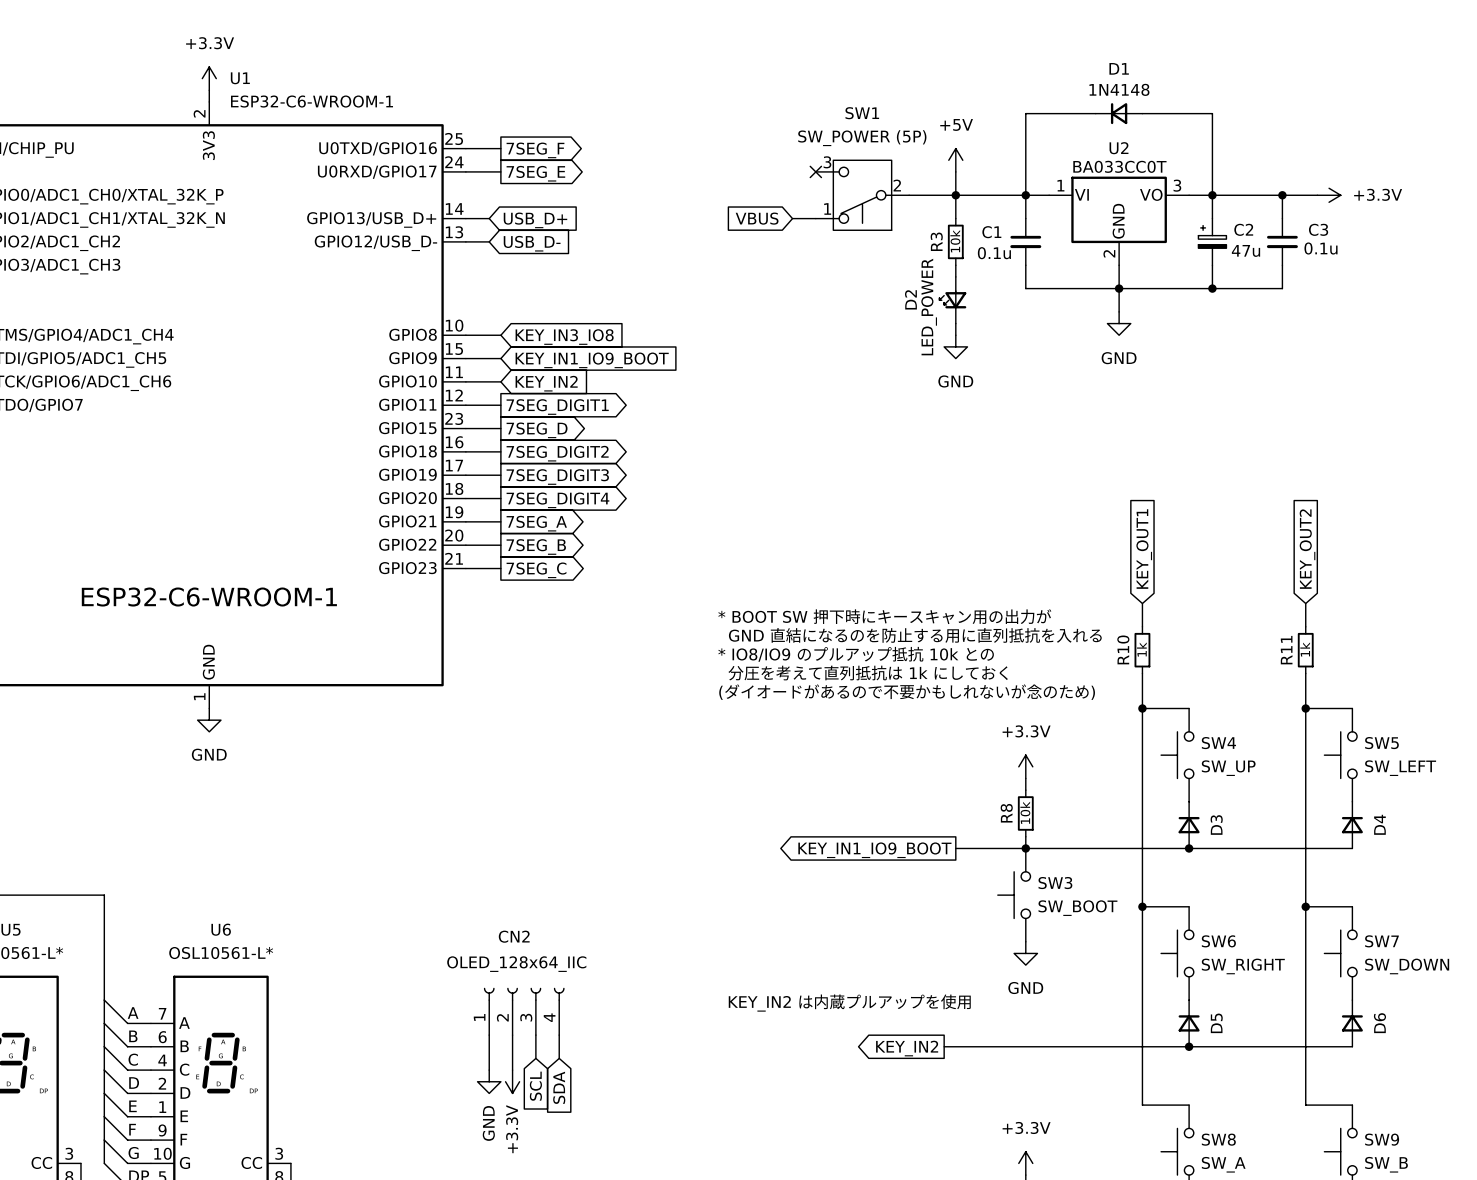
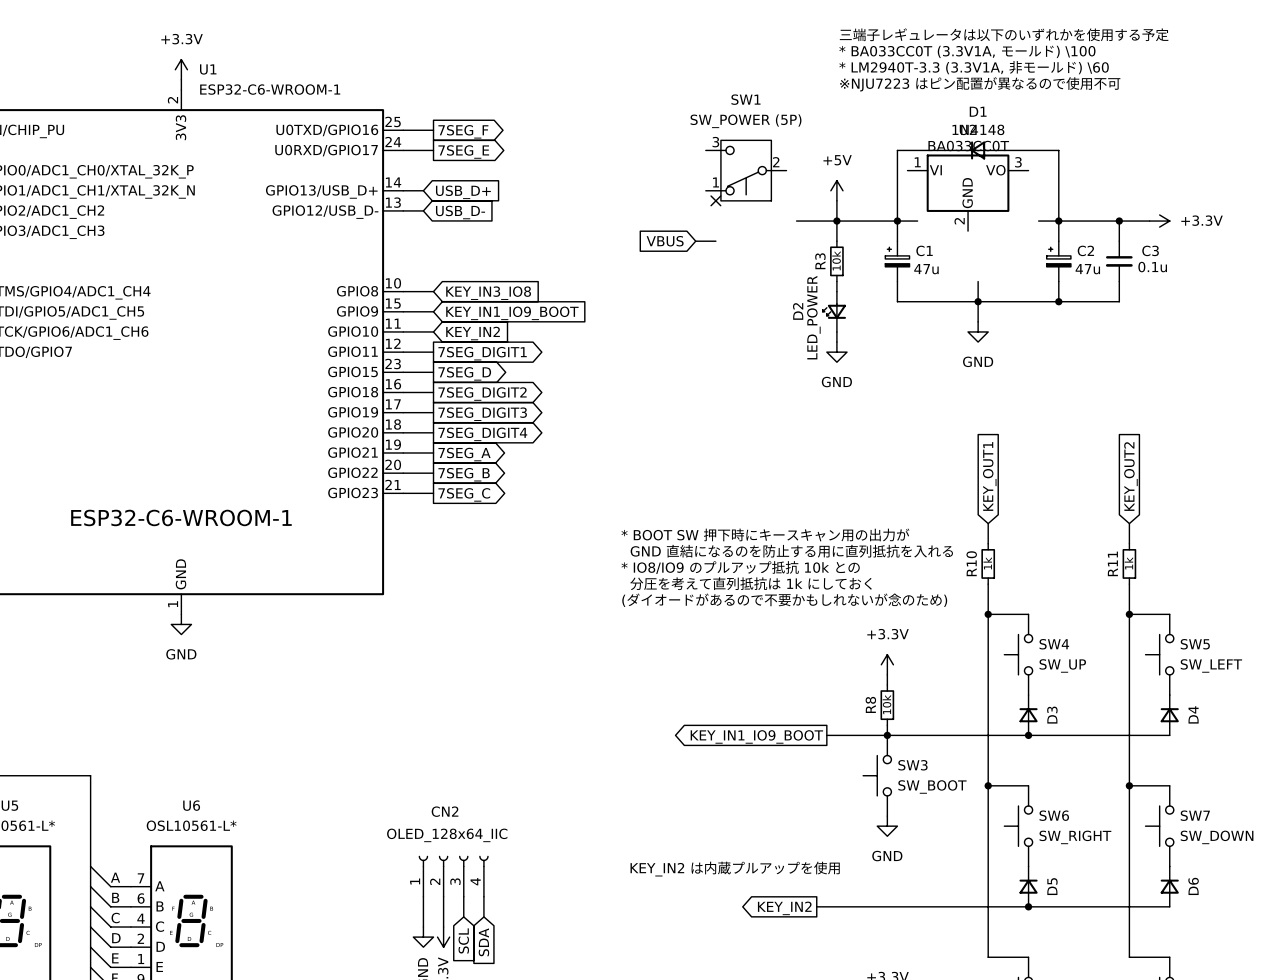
text: none -> 三端子レギュレータは以下のいずれかを使用する予定 (1004, 34)
text: none -> * BA033CC0T (3.3V1A, モールド) \100 (967, 51)
text: none -> * LM2940T-3.3 (3.3V1A, 非モールド) \60 (974, 67)
text: none -> ※NJU7223 はピン配置が異なるので使用不可 (980, 84)
wire: (1095, 113) (1025, 113) (1025, 218) -> (957, 150) (897, 150) (897, 241)
D1 position: (1119, 113) -> (978, 150)
wire: (1142, 113) (1212, 113) (1212, 218) -> (998, 150) (1058, 150) (1058, 241)
power symbol position: +5V (955, 160) -> +5V (836, 190)
no-connect mark: (815, 171) -> none
wire: (955, 171) (955, 218) -> (836, 200) (836, 241)
wire: (909, 195) (1049, 195) -> (796, 221) (917, 221)
junction: (955, 195) -> none
junction: (1025, 195) -> none
wire: (1189, 195) (1317, 195) -> (1038, 221) (1149, 221)
junction: (1212, 195) -> none
wire: (1282, 195) (1282, 218) -> (1119, 221) (1119, 241)
junction: (1282, 195) -> none
power symbol position: +3.3V (1329, 195) -> +3.3V (1159, 221)
global label position: VBUS (757, 218) -> VBUS (665, 241)
wire: (792, 218) (815, 218) -> (695, 241) (715, 241)
C1 symbol: [1010, 218, 1042, 266] -> [885, 241, 910, 282]
no-connect mark: none -> (715, 200)
C1 name position: C1 (991, 232) -> C1 (924, 250)
R3 position: (955, 241) -> (836, 261)
C2 position: (1212, 241) -> (1058, 261)
C3 position: (1282, 241) -> (1119, 261)
junction: none -> (836, 221)
C1 value: 0.1u (994, 253) -> 47u (926, 269)
junction: none -> (897, 221)
junction: none -> (1058, 221)
junction: none -> (1119, 221)
wire: (955, 265) (955, 276) -> (836, 281) (836, 291)
wire: (1025, 265) (1025, 288) (1282, 288) (1282, 265) -> (897, 281) (897, 301) (1119, 301) (1119, 281)
wire: (1119, 265) (1119, 311) -> (978, 281) (978, 321)
wire: (1212, 265) (1212, 288) -> (1058, 281) (1058, 301)
junction: (1119, 288) -> none
junction: (1212, 288) -> none
D2 position: (952, 300) -> (834, 311)
wire: (955, 323) (955, 335) -> (836, 331) (836, 342)
power symbol position: GND (1119, 323) -> GND (978, 331)
power symbol position: GND (955, 346) -> GND (836, 352)
junction: none -> (978, 301)
junction: none -> (1058, 301)

